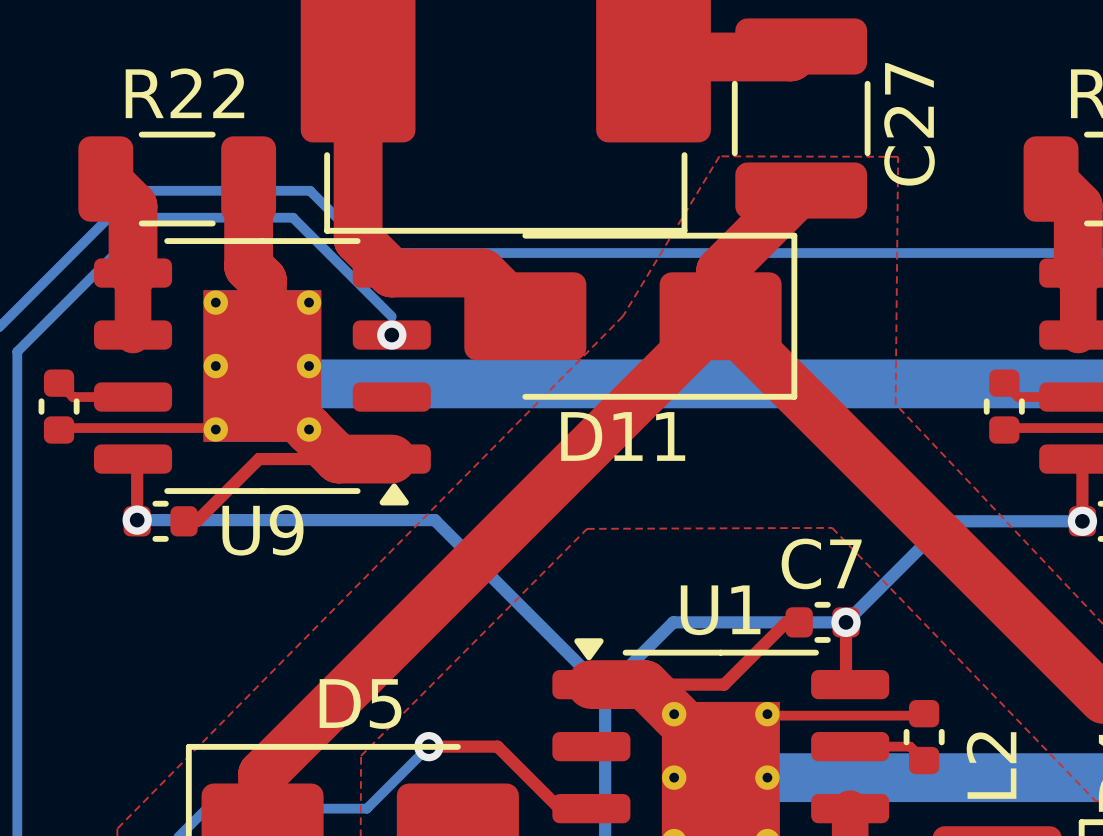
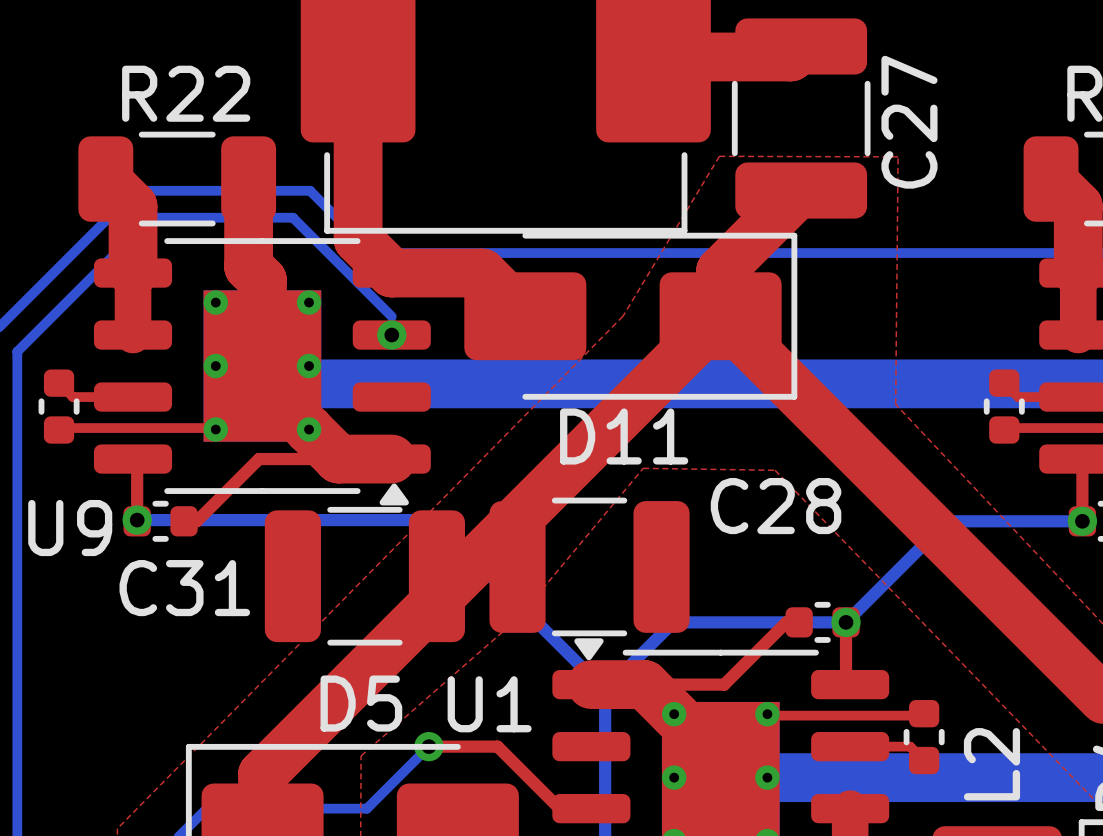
U9 name position: U9 (262, 530) -> U9 (70, 528)
C7 name: C7 (821, 563) -> none
C28: none -> (589, 566)
C31: none -> (364, 576)
U1 name position: U1 (720, 610) -> U1 (489, 704)
top zone outline: (361, 755) (587, 528) (832, 527) (1095, 800) -> (361, 755) (517, 618) (643, 468) (775, 470) (1095, 800)

